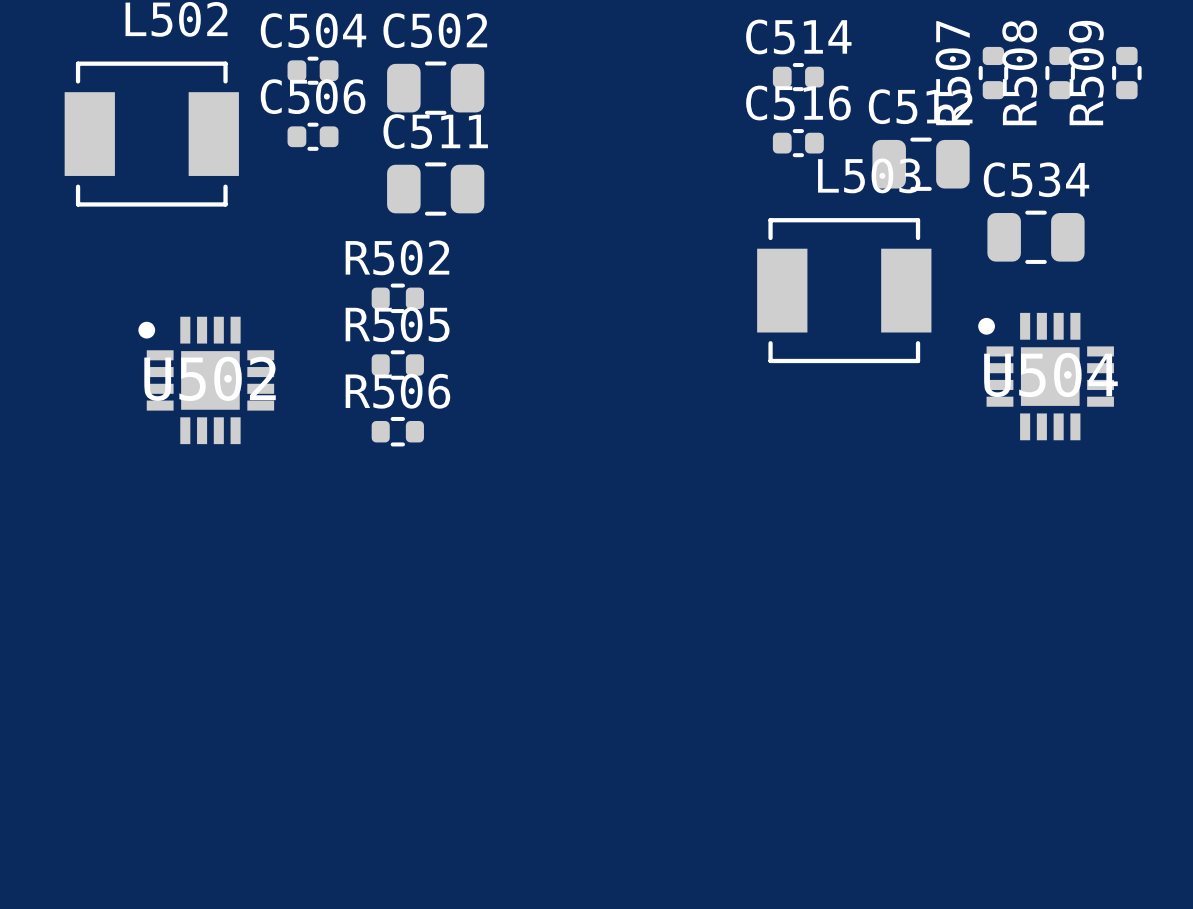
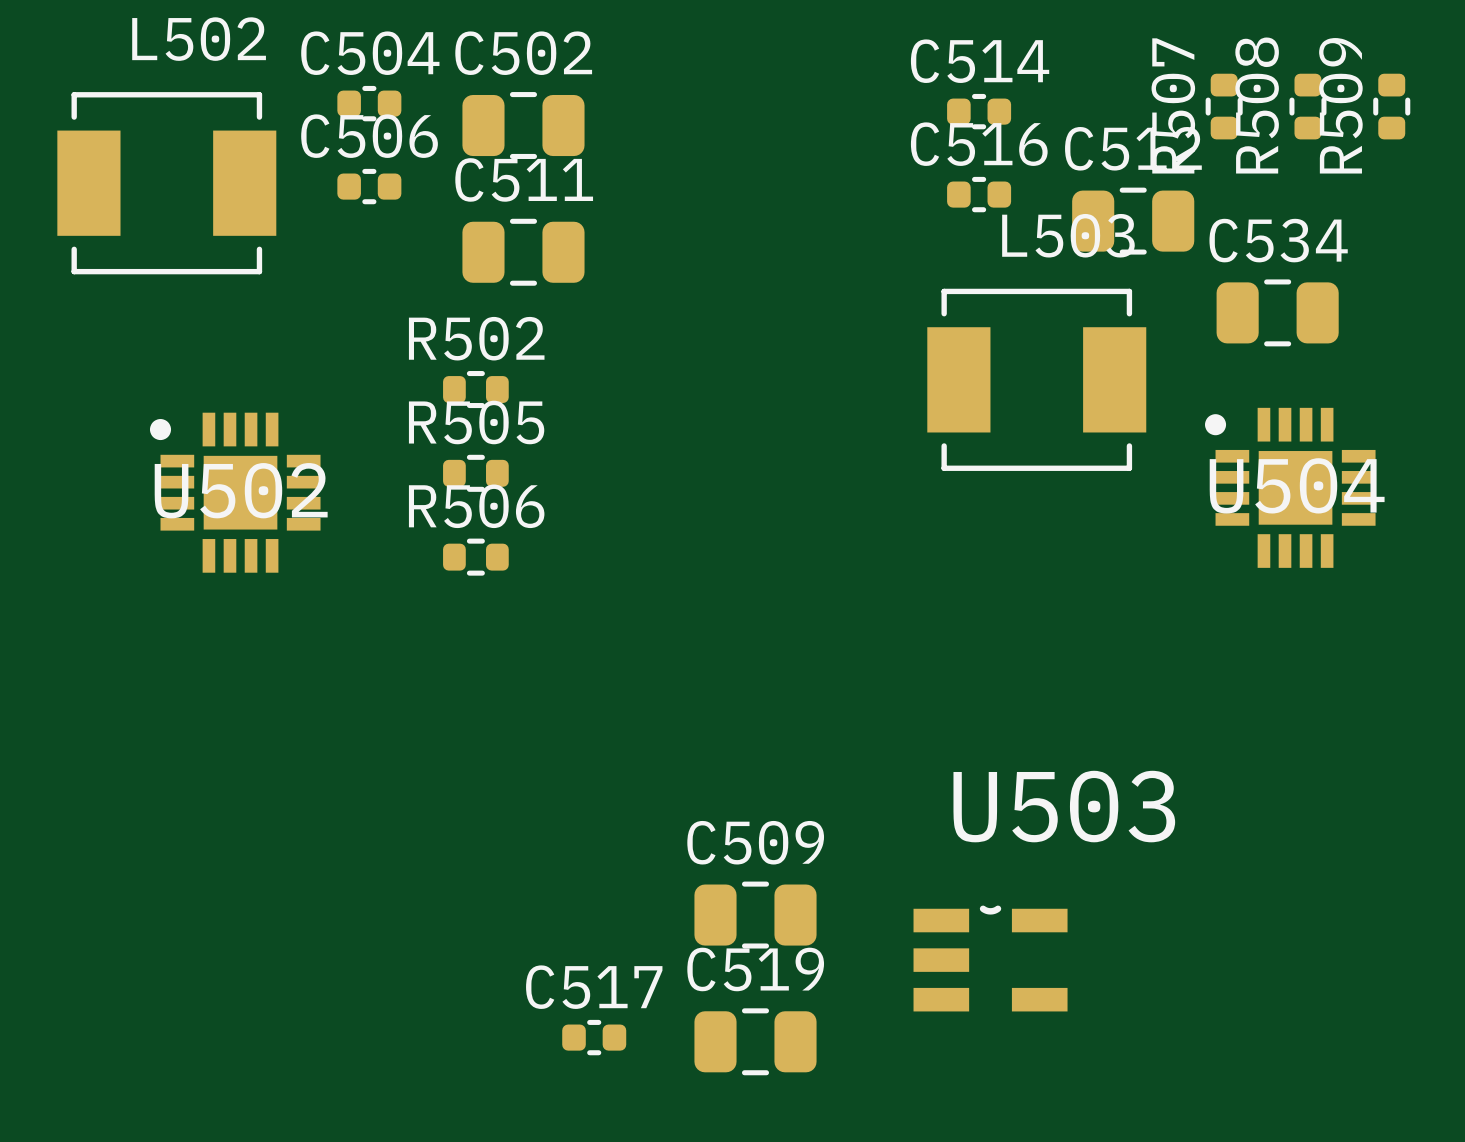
C509: none -> (755, 915)
U503: none -> (990, 958)
C517: none -> (594, 1037)
C519: none -> (755, 1041)

